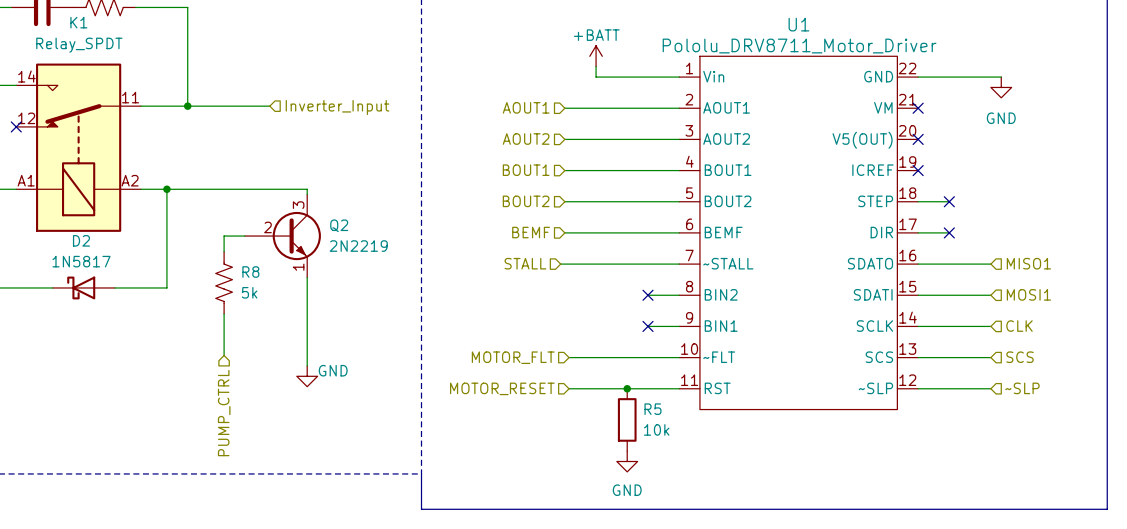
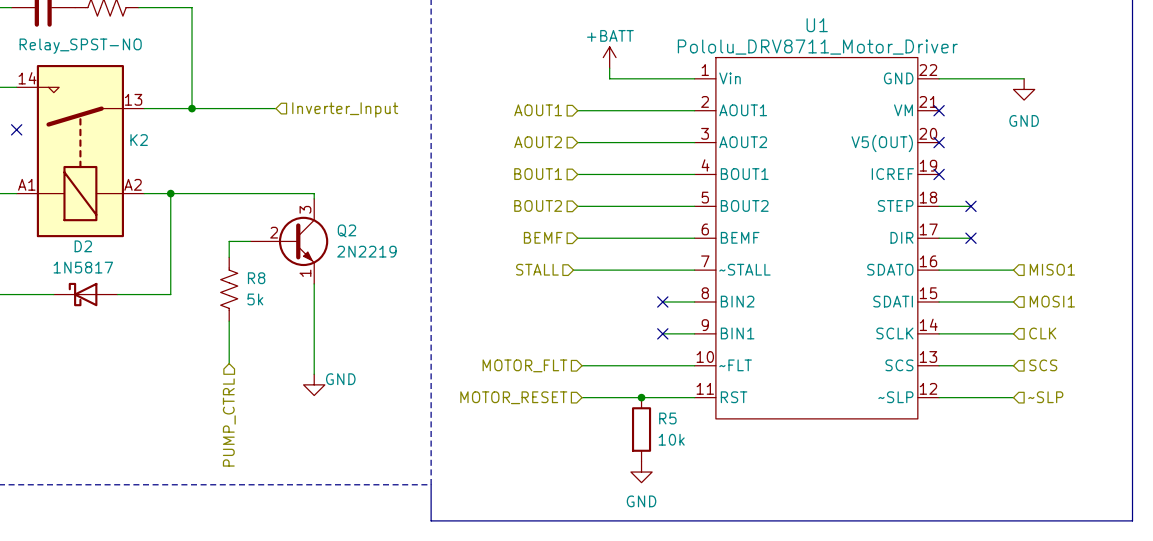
K1: Relay_SPDT (78, 147) -> none
K2: none -> Relay_SPST-NO (80, 151)

